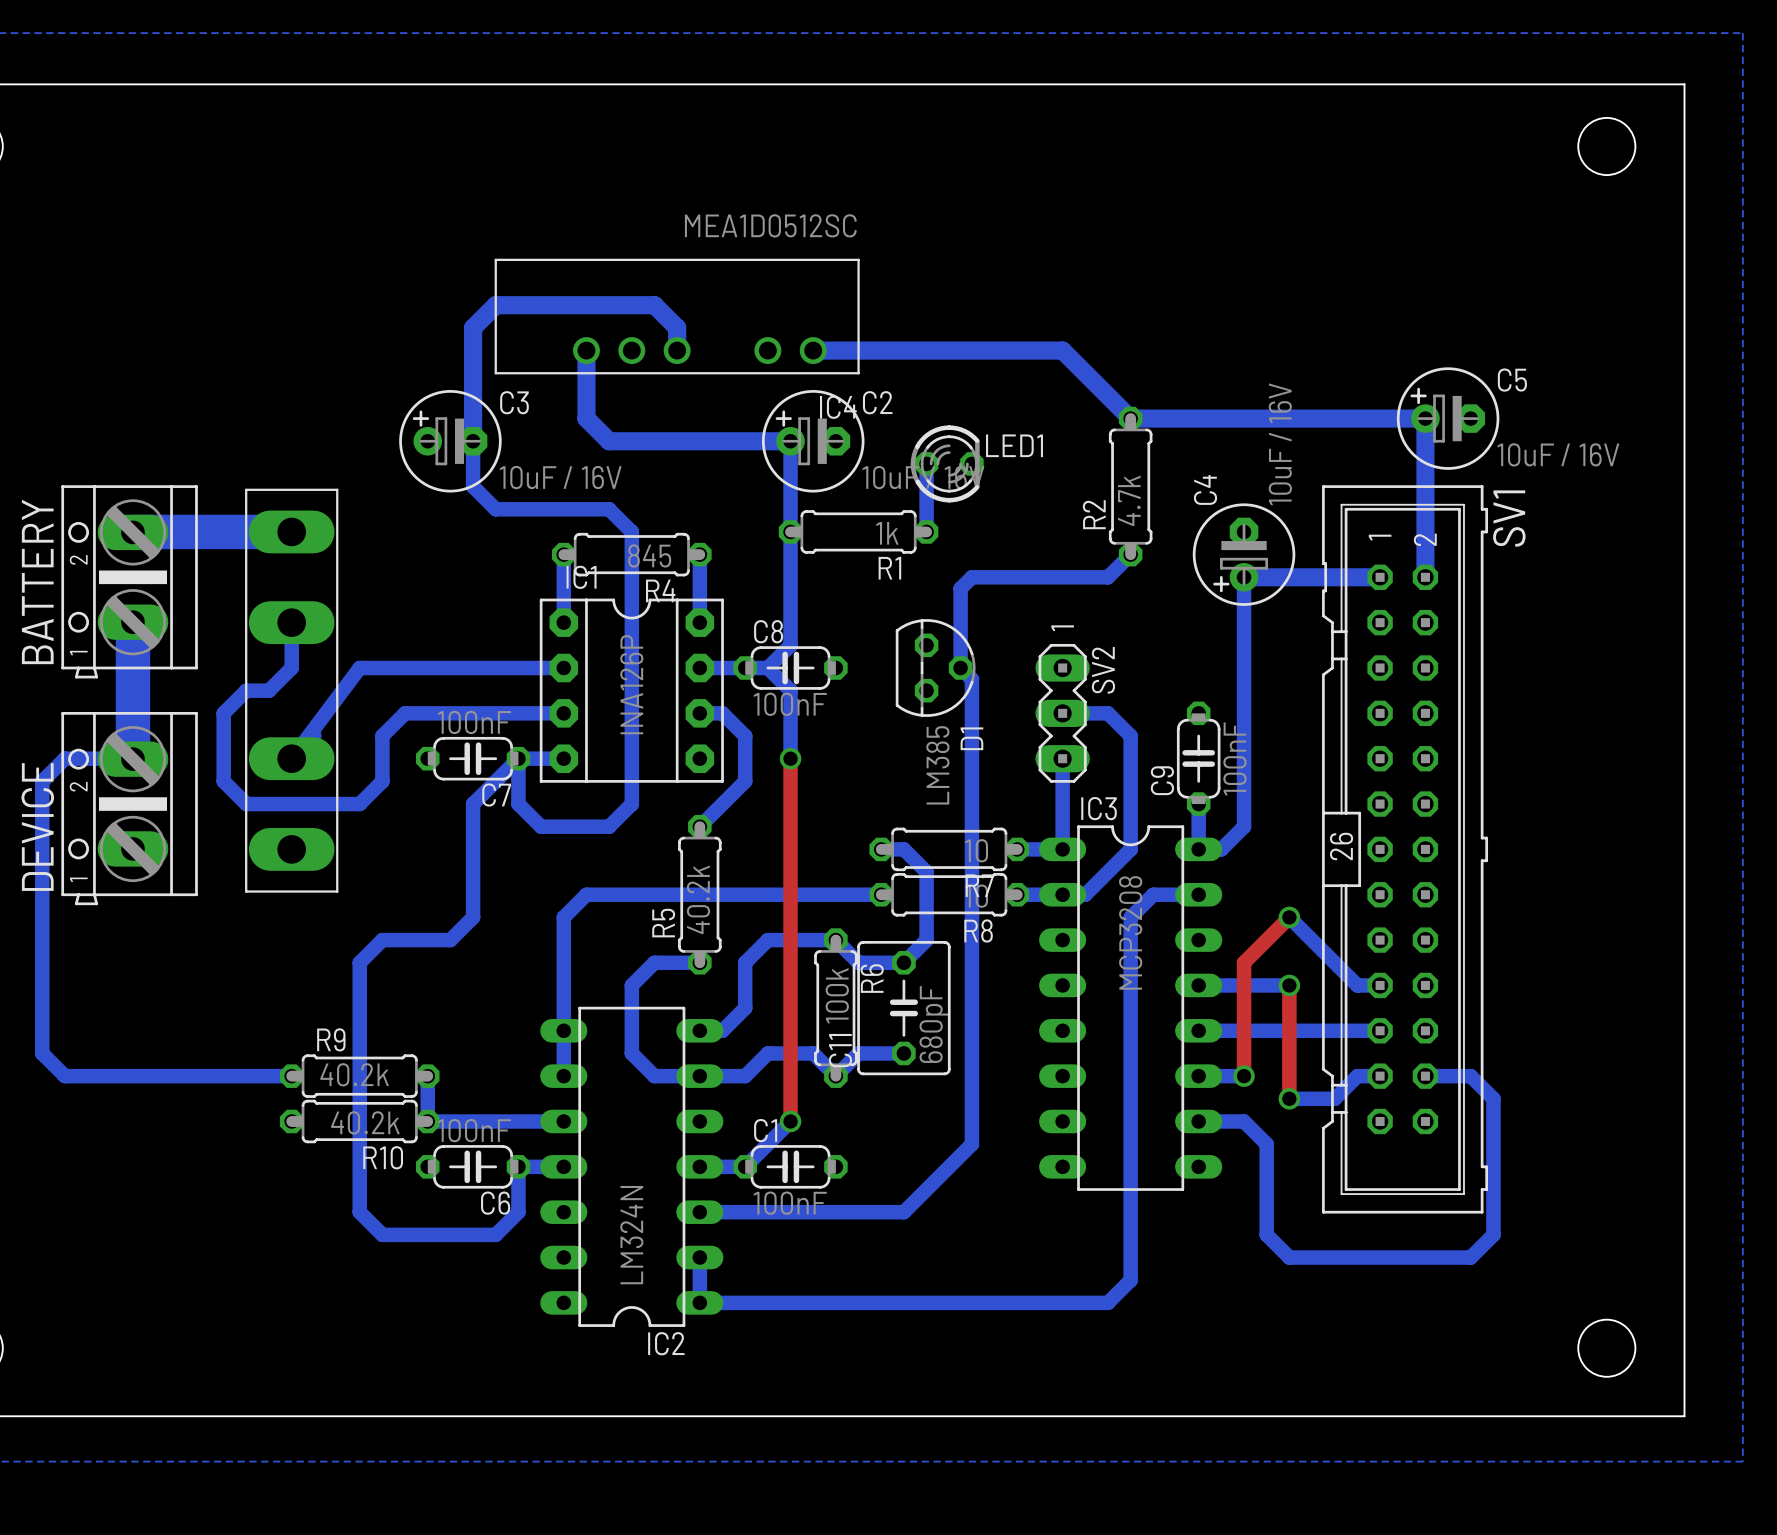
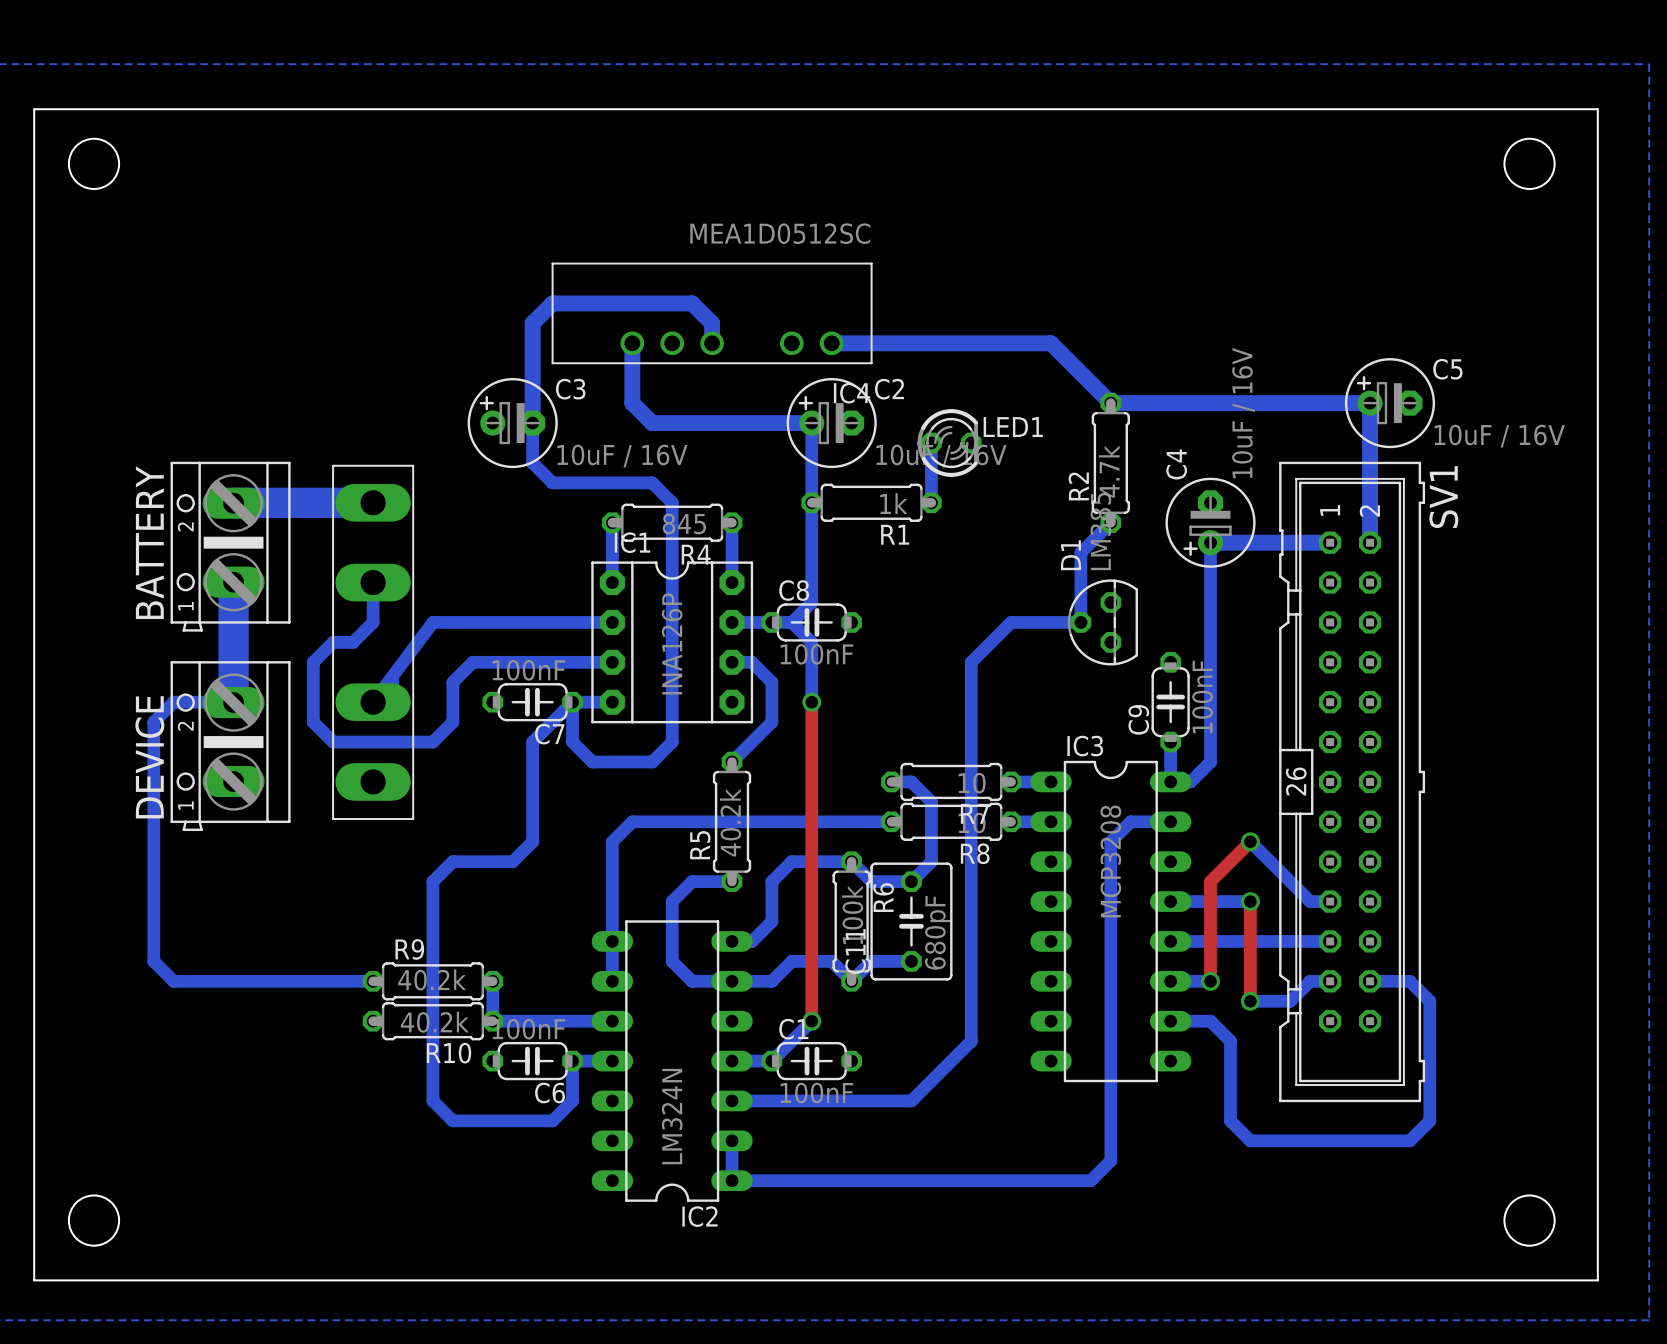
bottom track: (1107, 577) (971, 577) (960, 588) (960, 668) (971, 679) (971, 713) -> (1090, 542) (1080, 552) (1080, 622) (1011, 622) (971, 662)
D1 rotation: 0° (935, 668) -> 180° (1102, 622)
D1 position: (935, 668) -> (1102, 622)
bottom track: (1062, 713) (1107, 713) (1130, 736) (1130, 849) (1085, 894) (1062, 894) -> none
SV2: (1062, 713) -> none
bottom track: (1062, 758) (1062, 849) -> none

